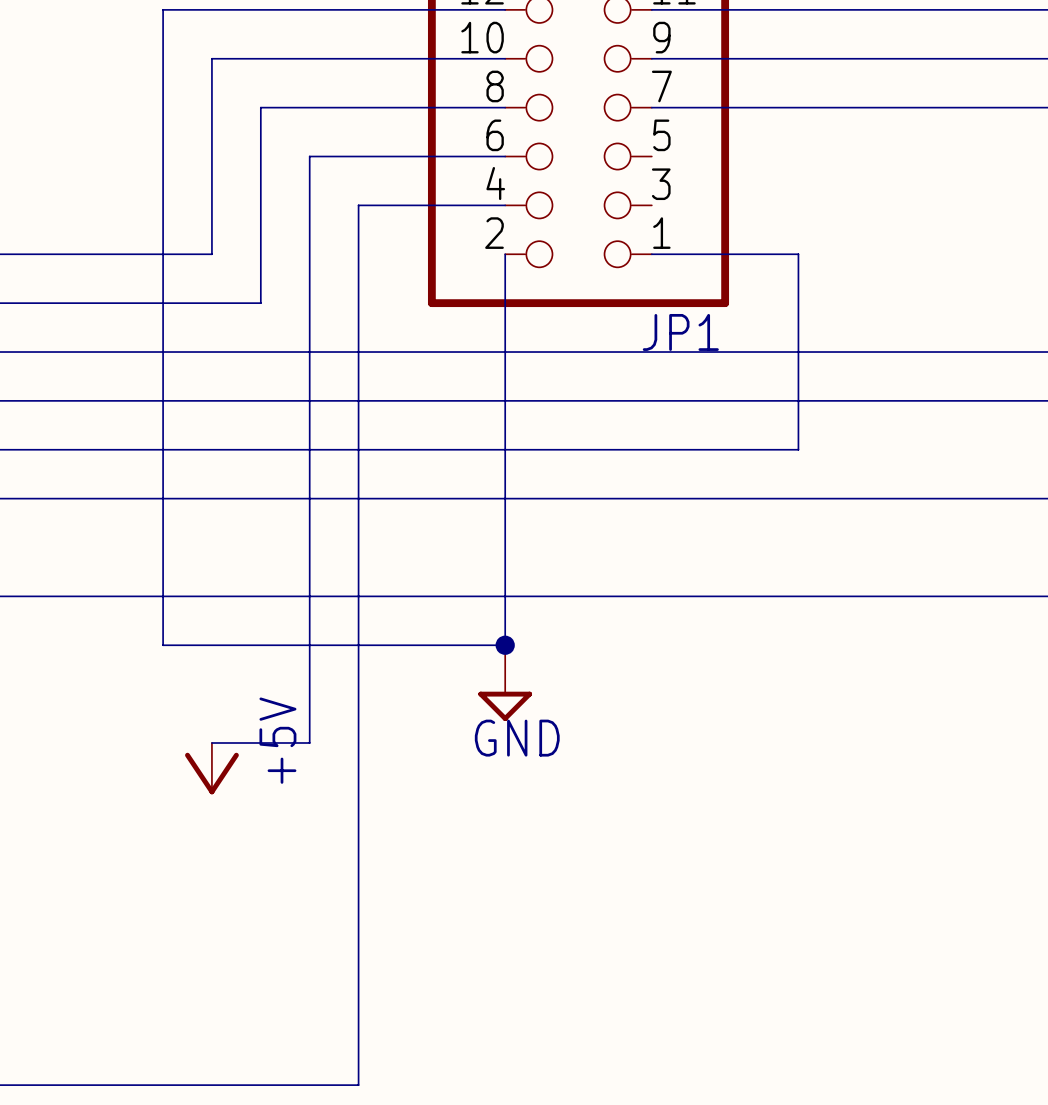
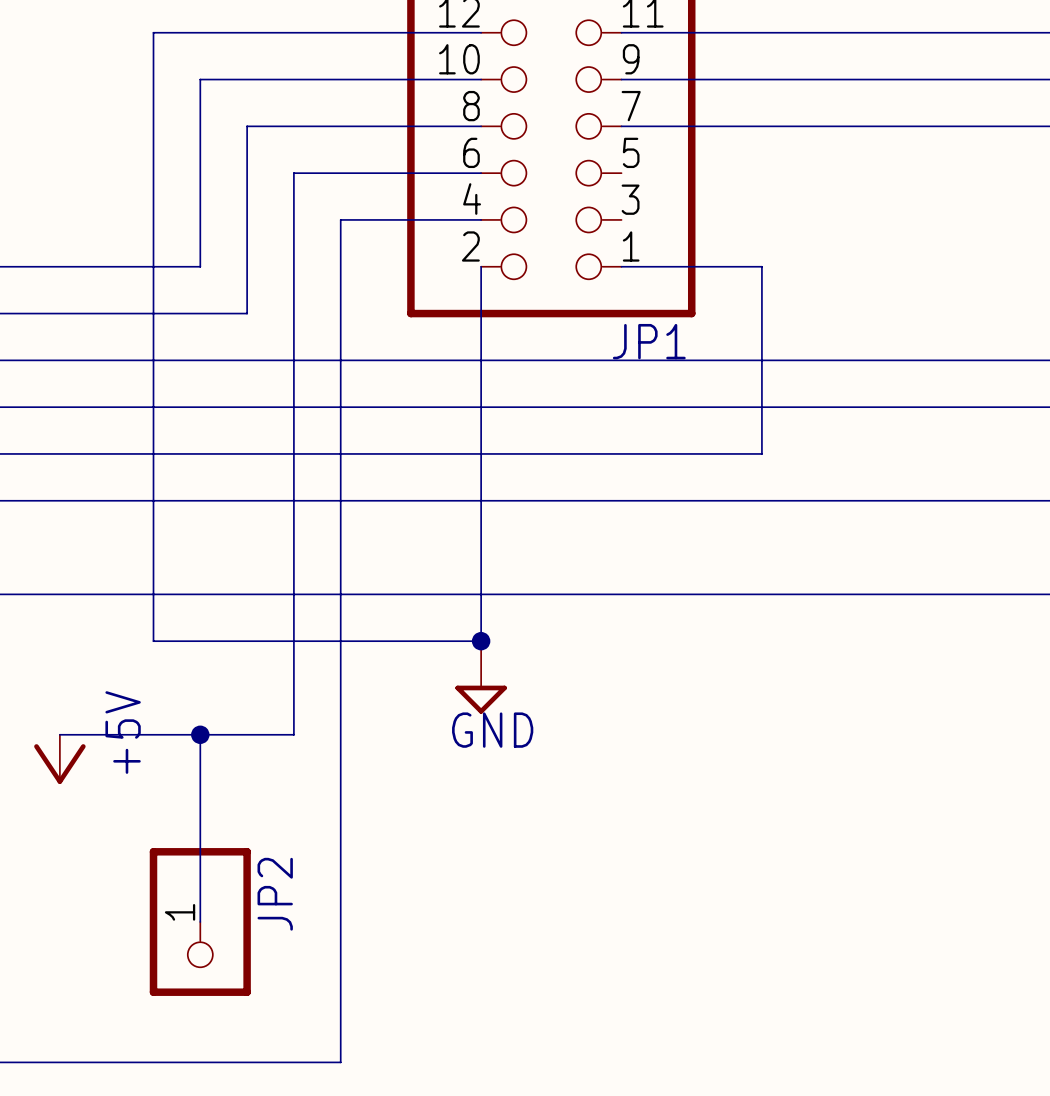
wire: none -> (59, 734) (200, 734) (200, 921)
junction: none -> (200, 734)
power symbol position: +5V (211, 768) -> +5V (59, 759)
JP2: none -> (200, 921)

